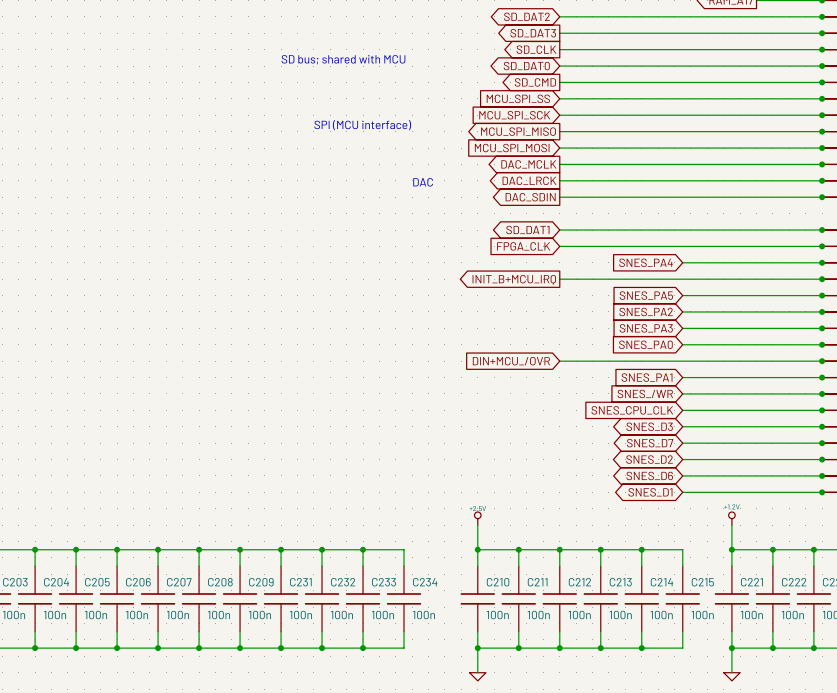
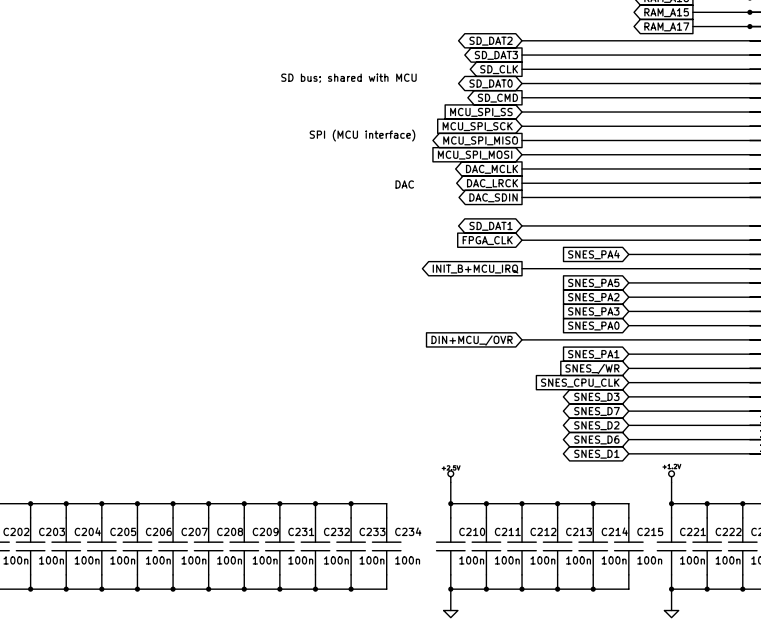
junction: (822, 16) -> none
junction: (822, 33) -> none
junction: (822, 49) -> none
junction: (822, 66) -> none
junction: (822, 82) -> none
junction: (822, 98) -> none
junction: (822, 115) -> none
junction: (822, 131) -> none
junction: (822, 148) -> none
junction: (822, 164) -> none
junction: (822, 180) -> none
junction: (822, 197) -> none
junction: (822, 230) -> none
junction: (822, 246) -> none
junction: (822, 262) -> none
junction: (822, 279) -> none
junction: (822, 295) -> none
junction: (822, 311) -> none
junction: (822, 328) -> none
junction: (822, 344) -> none
junction: (822, 361) -> none
junction: (822, 377) -> none
junction: (822, 393) -> none
junction: (822, 410) -> none
junction: (822, 426) -> none
junction: (822, 443) -> none
junction: (822, 459) -> none
junction: (822, 475) -> none
junction: (822, 492) -> none

